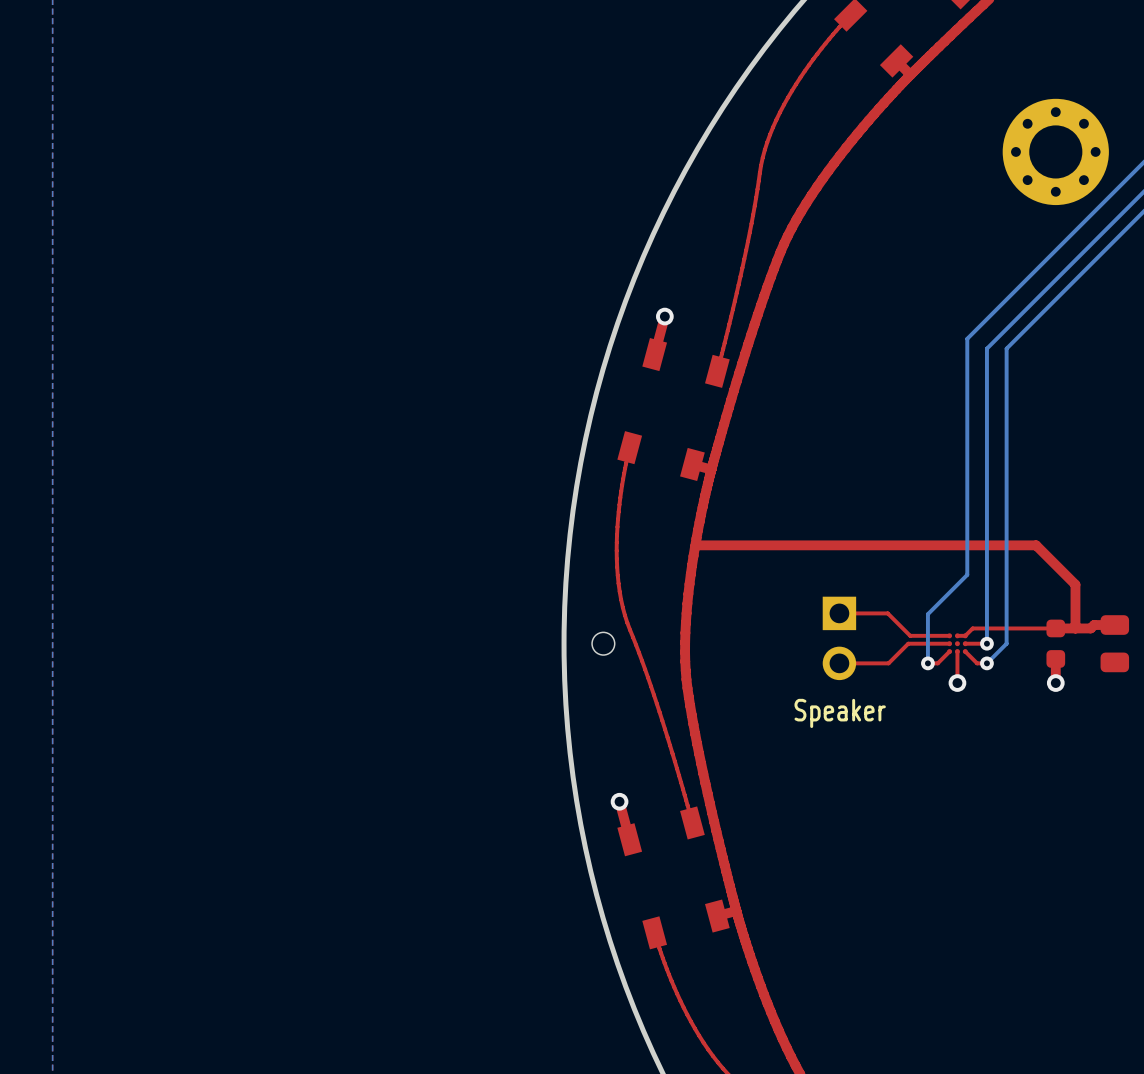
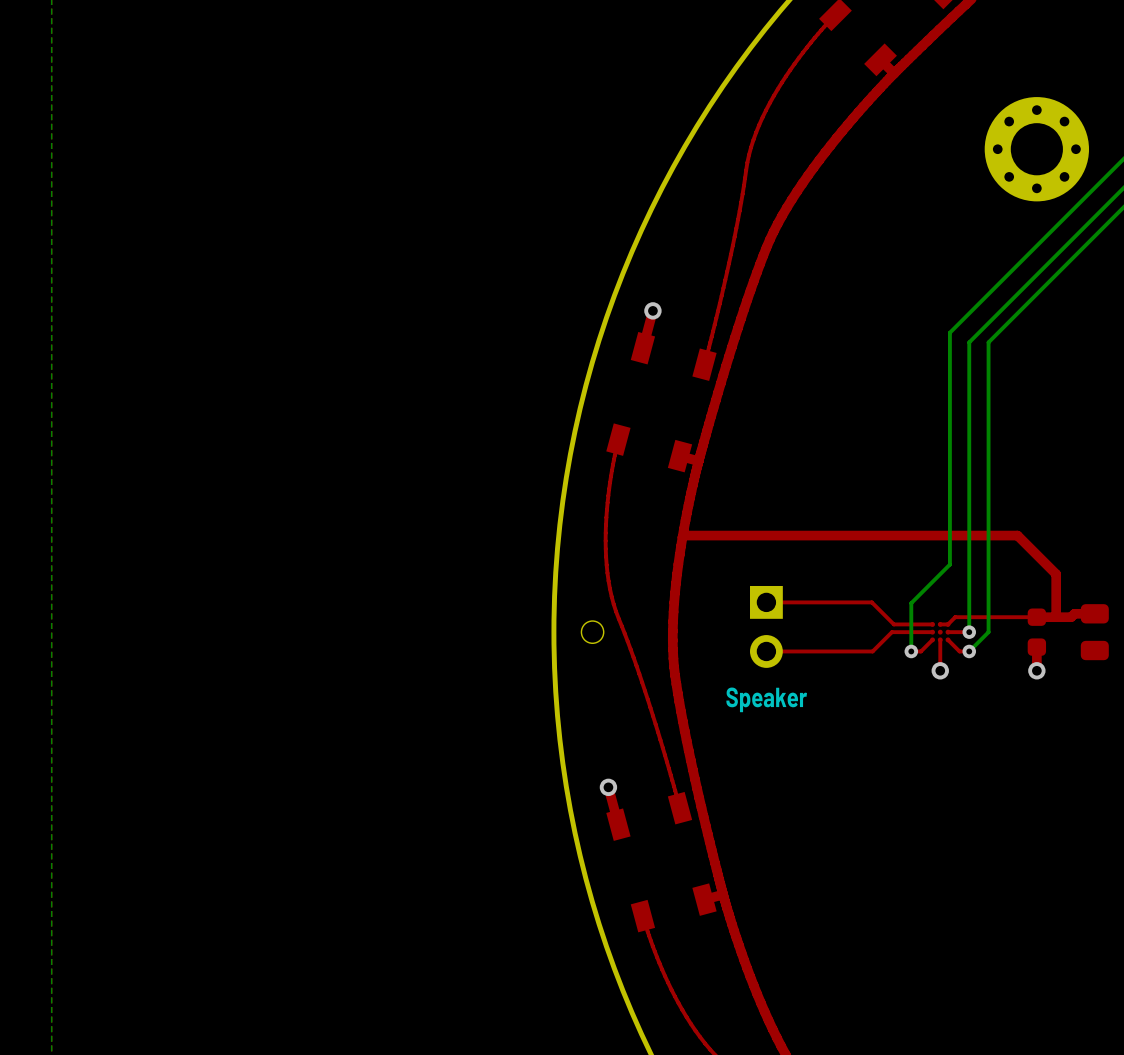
top track: none -> (824, 602) (766, 602)
part position: (839, 638) -> (766, 626)
top track: none -> (824, 651) (766, 651)
text position: Speaker (840, 713) -> Speaker (766, 699)

